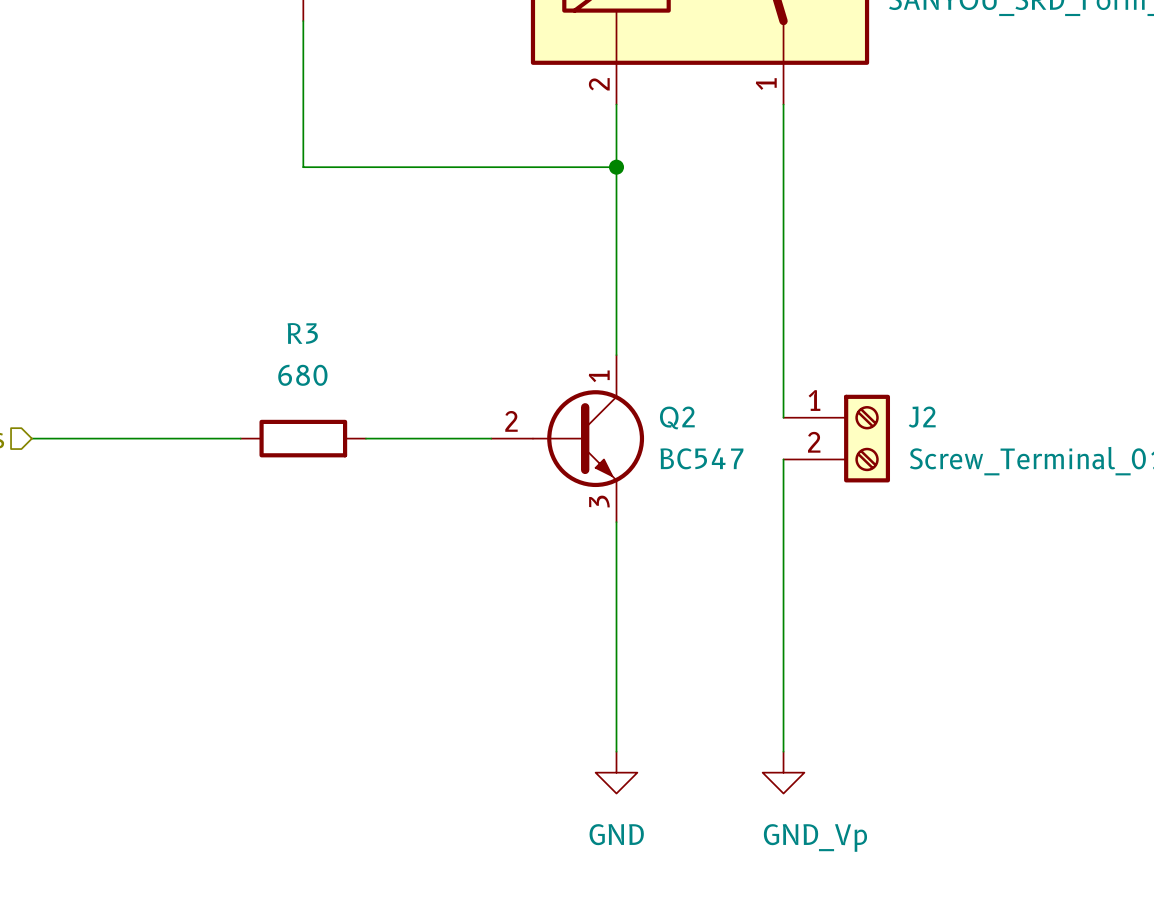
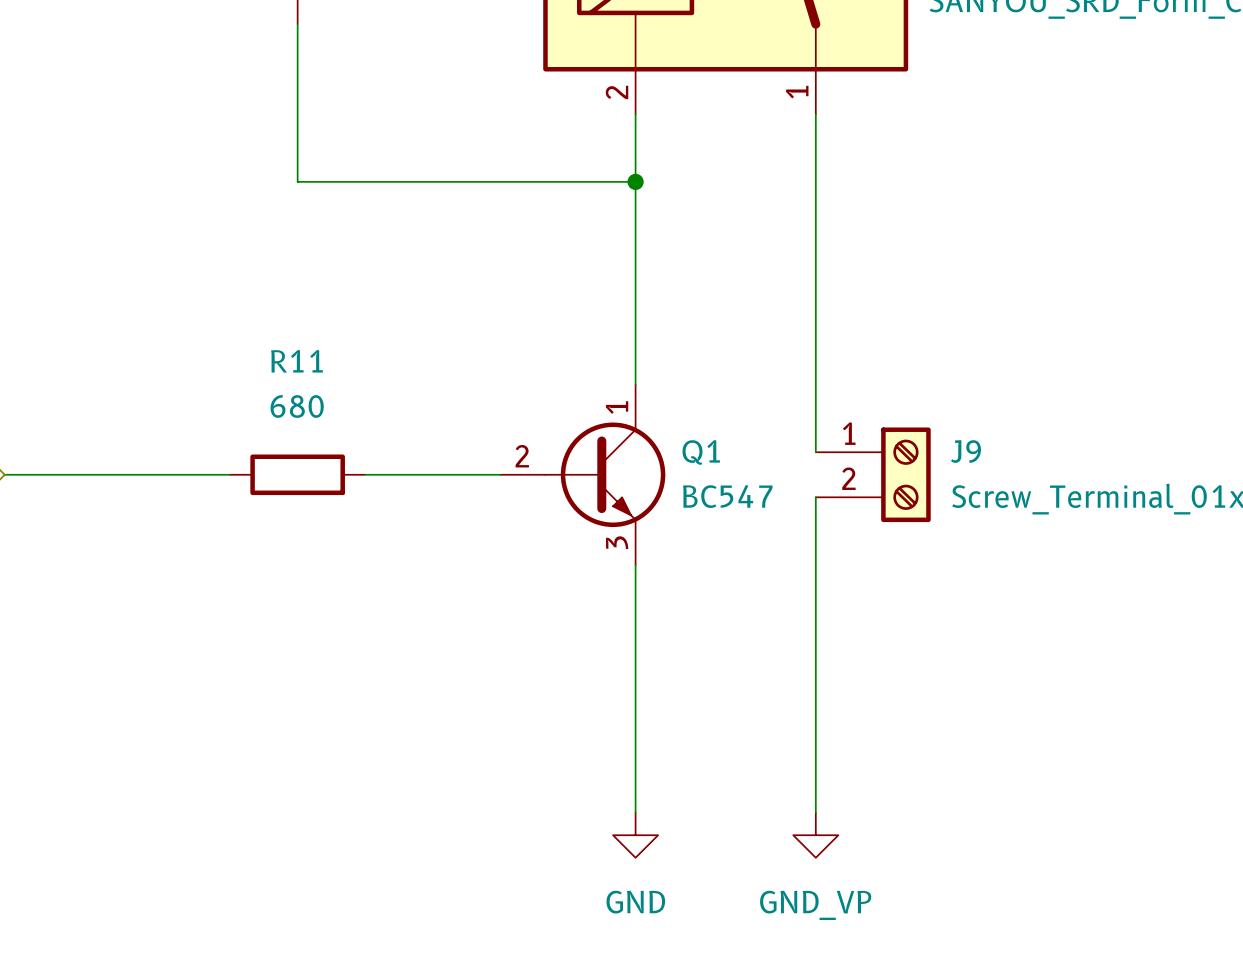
R3 name: R3 (302, 333) -> R11 (296, 361)
Q2 name: Q2 (677, 417) -> Q1 (701, 452)
J2 name: J2 (922, 417) -> J9 (965, 451)
power symbol: GND_Vp (783, 772) -> GND_VP (815, 835)

